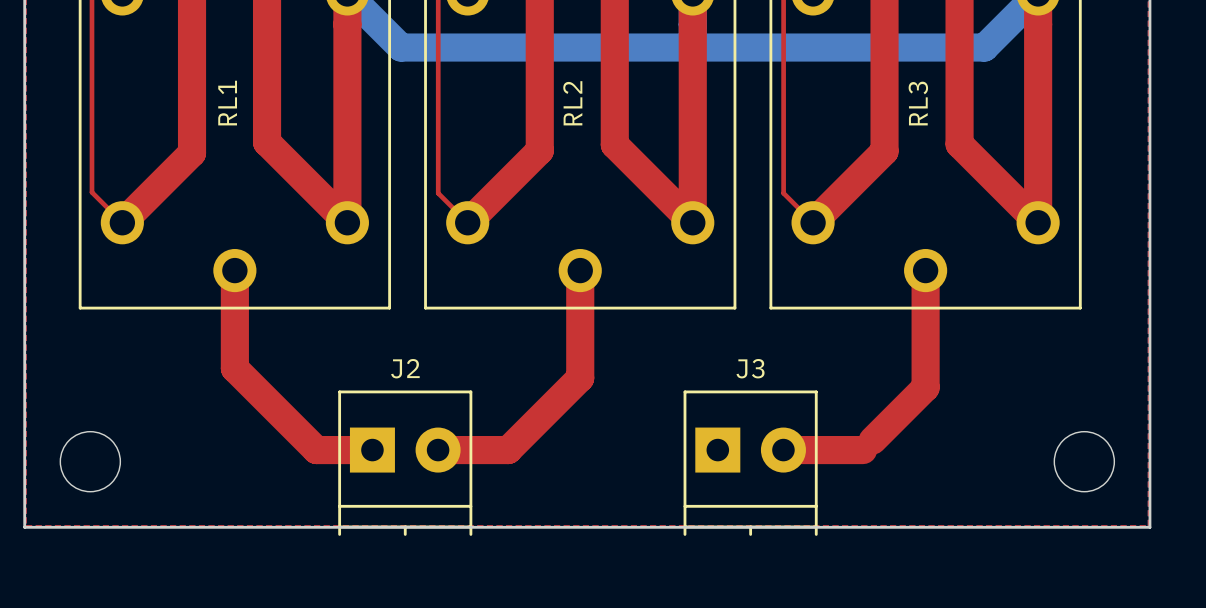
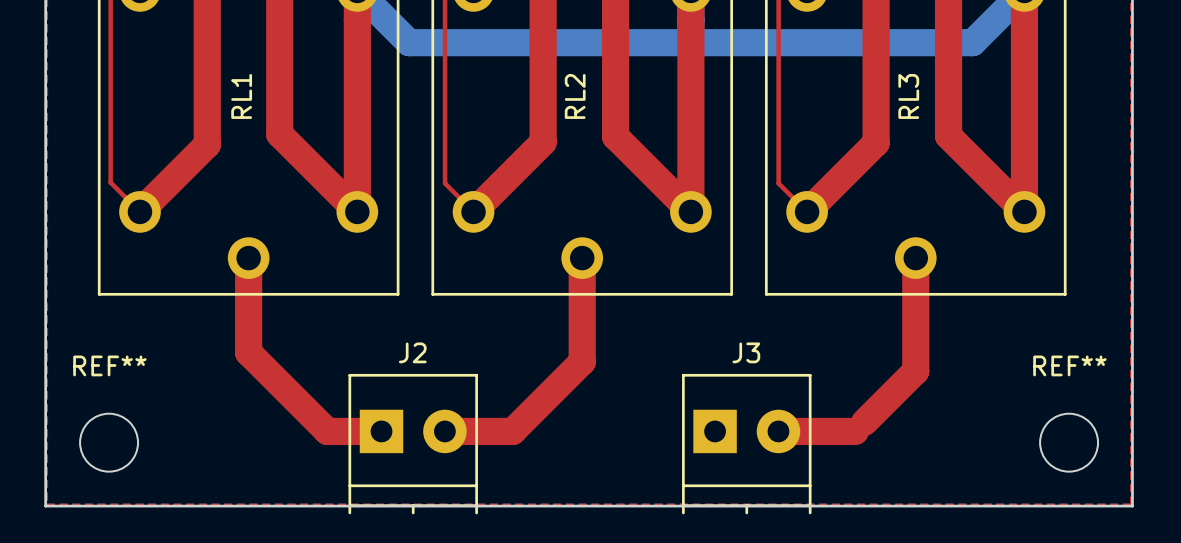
REF** name: none -> REF** (109, 365)
REF** name: none -> REF** (1069, 365)

